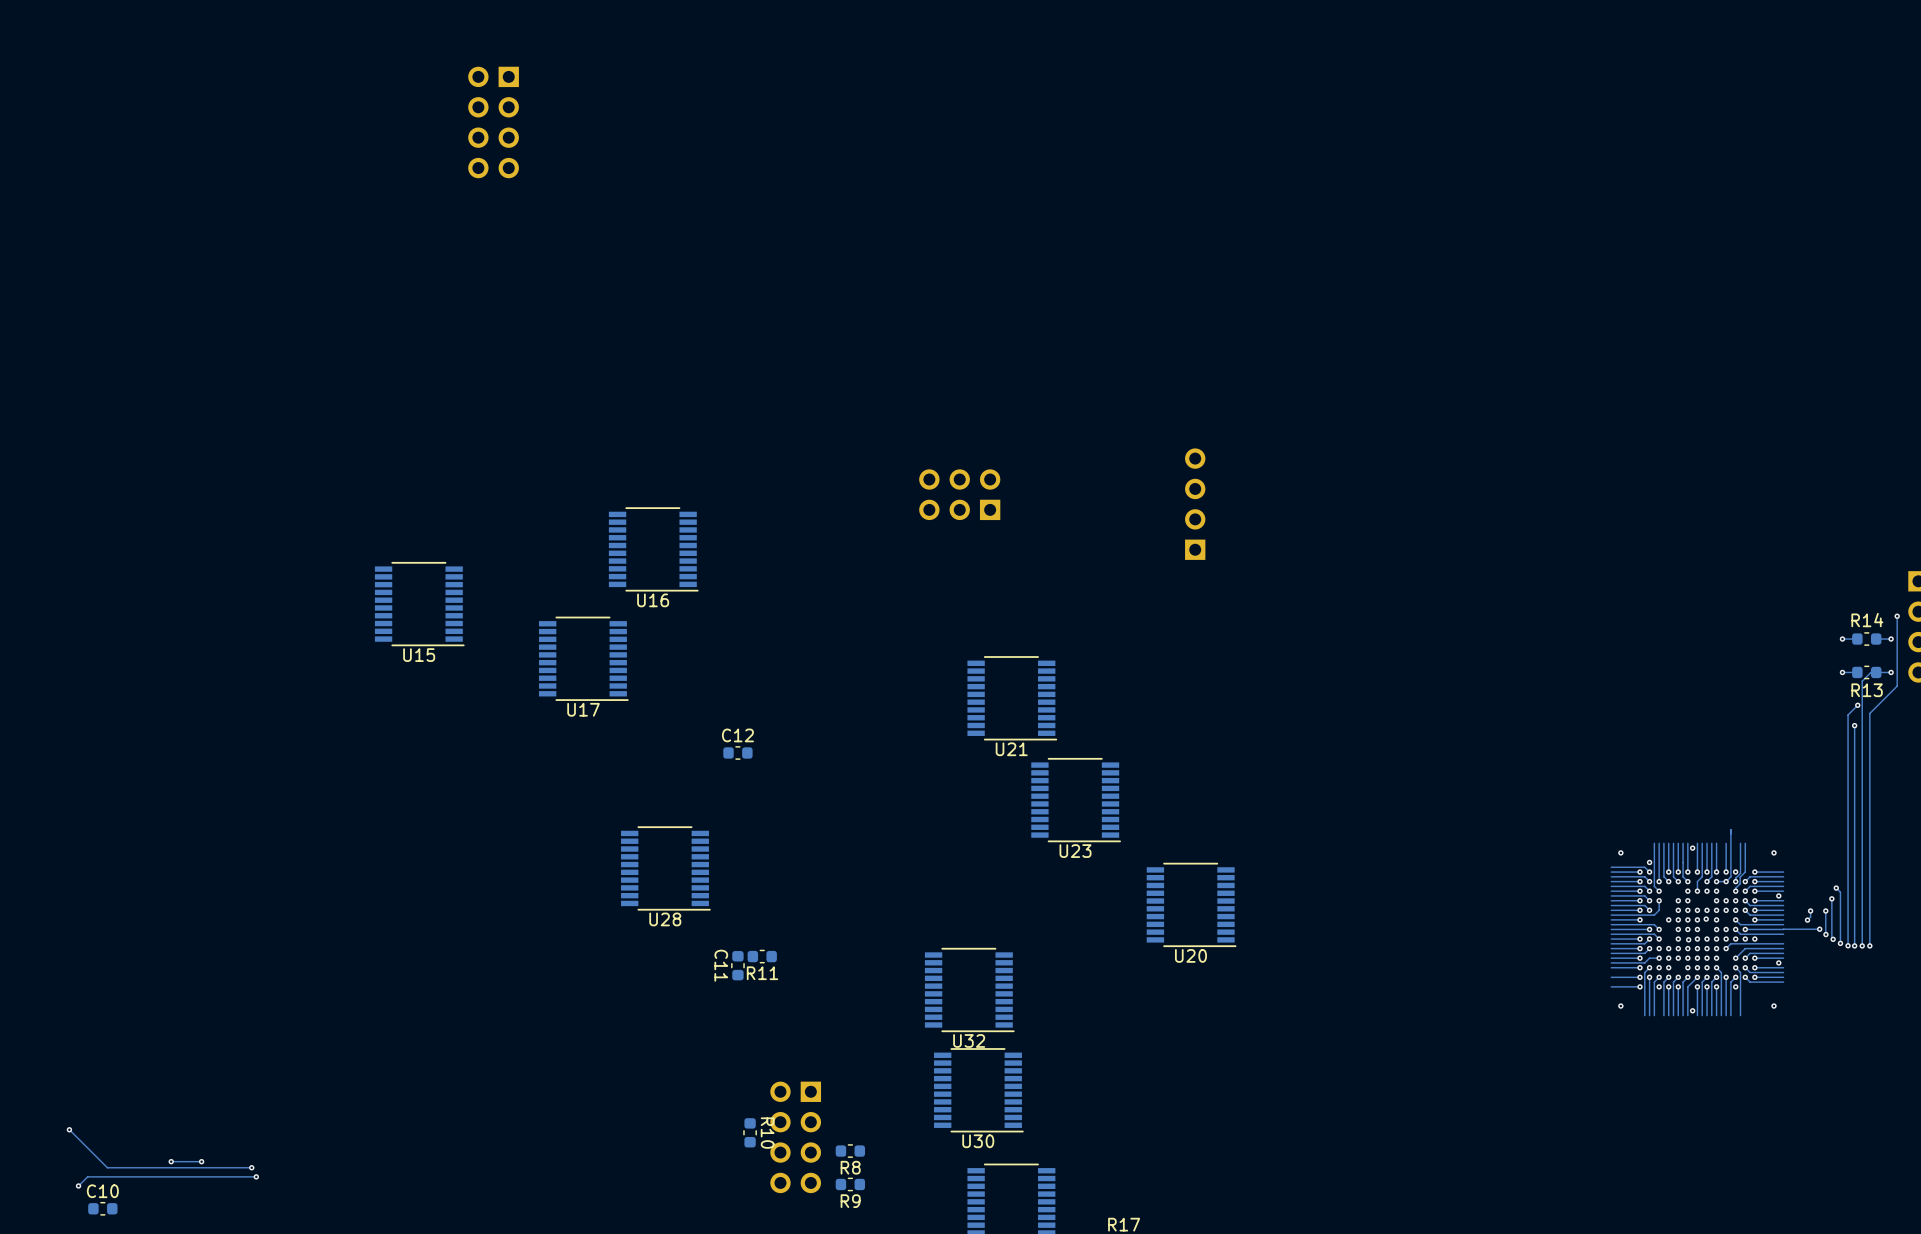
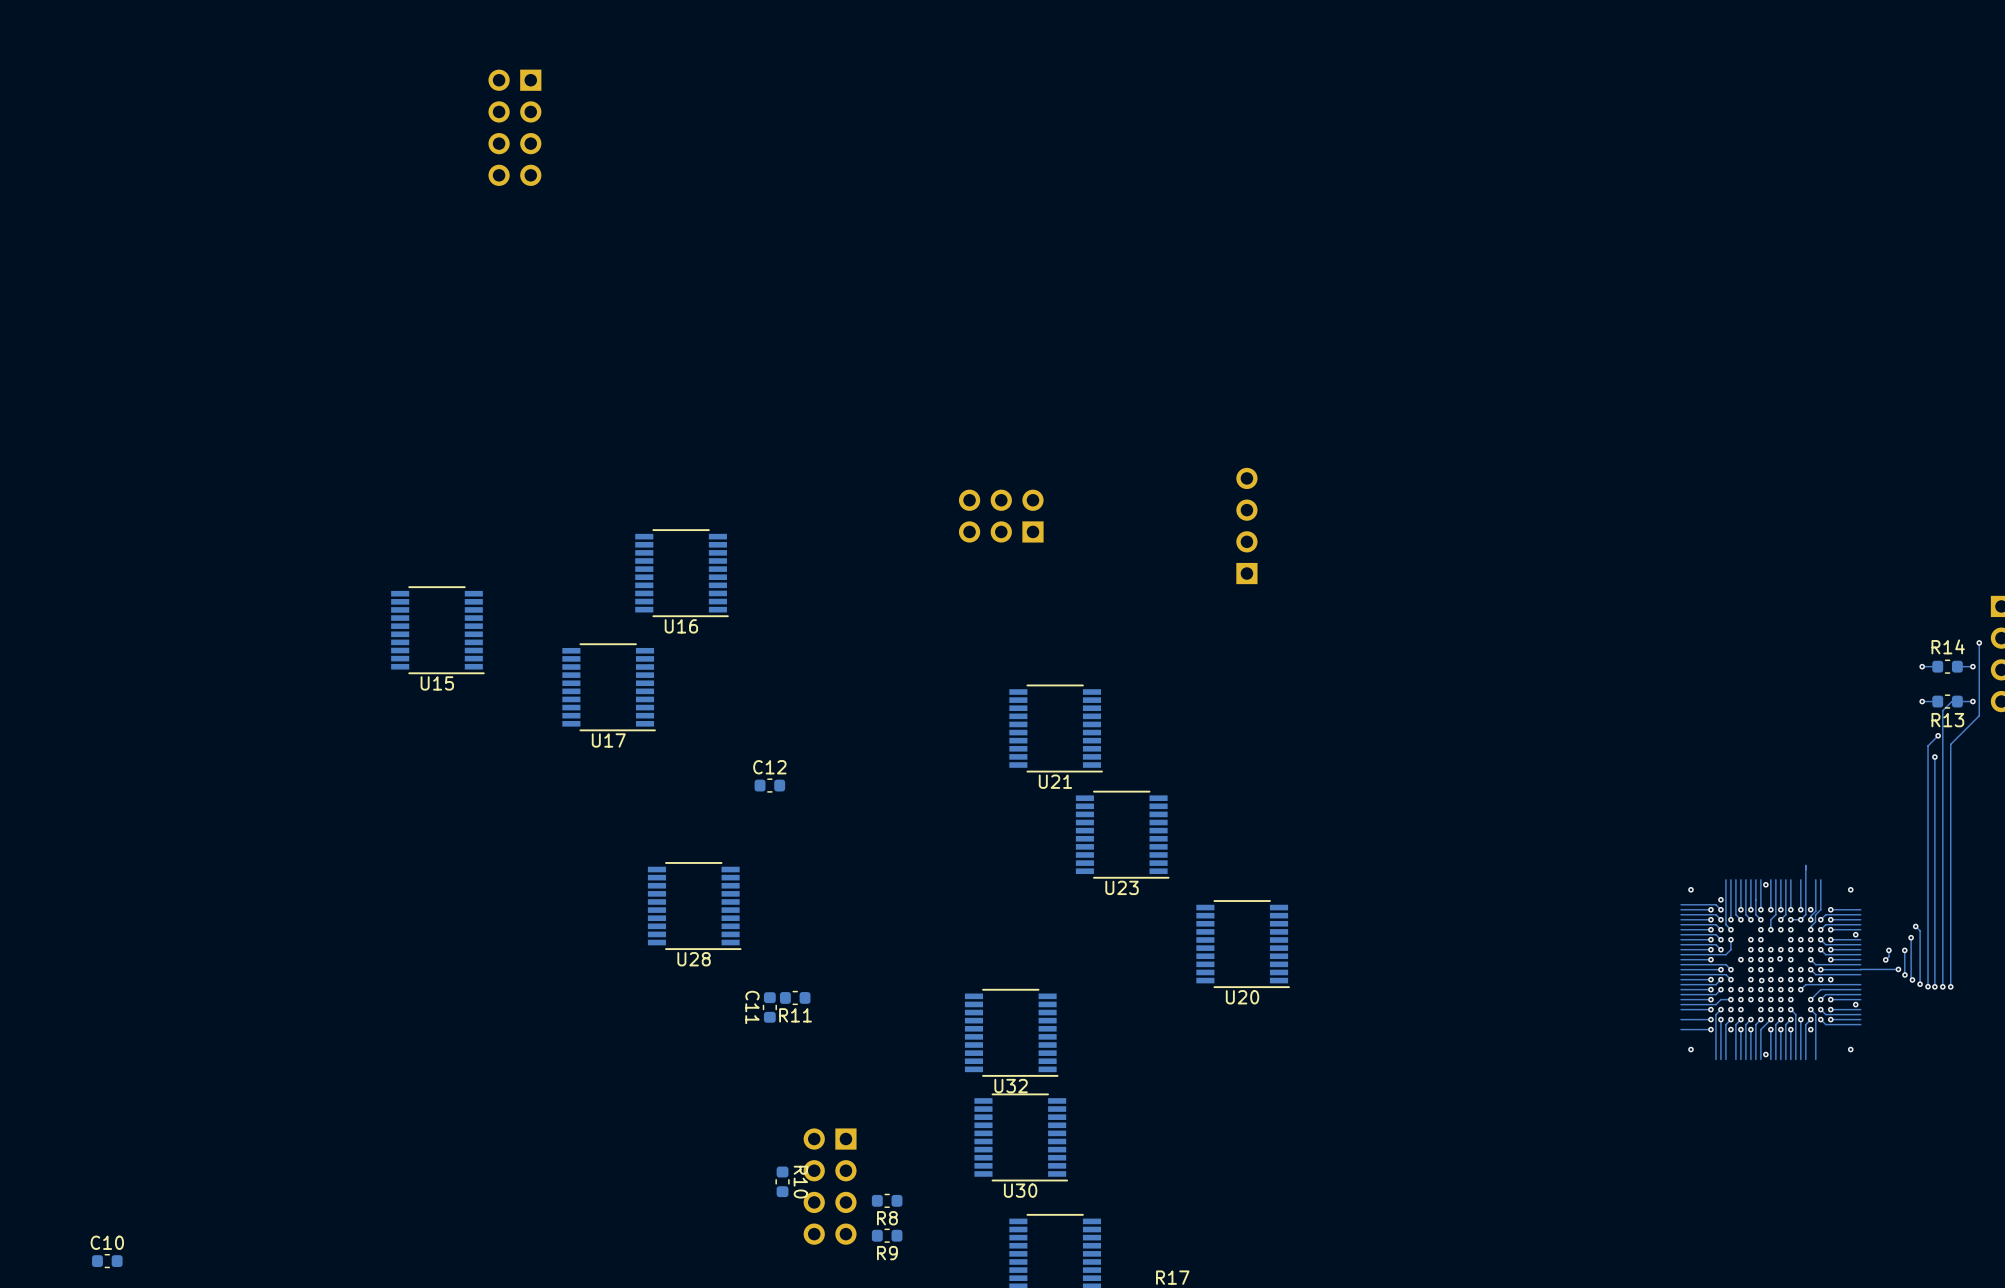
track: (69, 1129) (107, 1167) (251, 1167) -> none
via: (69, 1129) -> none
via: (171, 1161) -> none
track: (201, 1161) (171, 1161) -> none
via: (201, 1161) -> none
via: (251, 1167) -> none
track: (256, 1176) (87, 1176) (78, 1185) -> none
via: (256, 1176) -> none
via: (78, 1185) -> none

